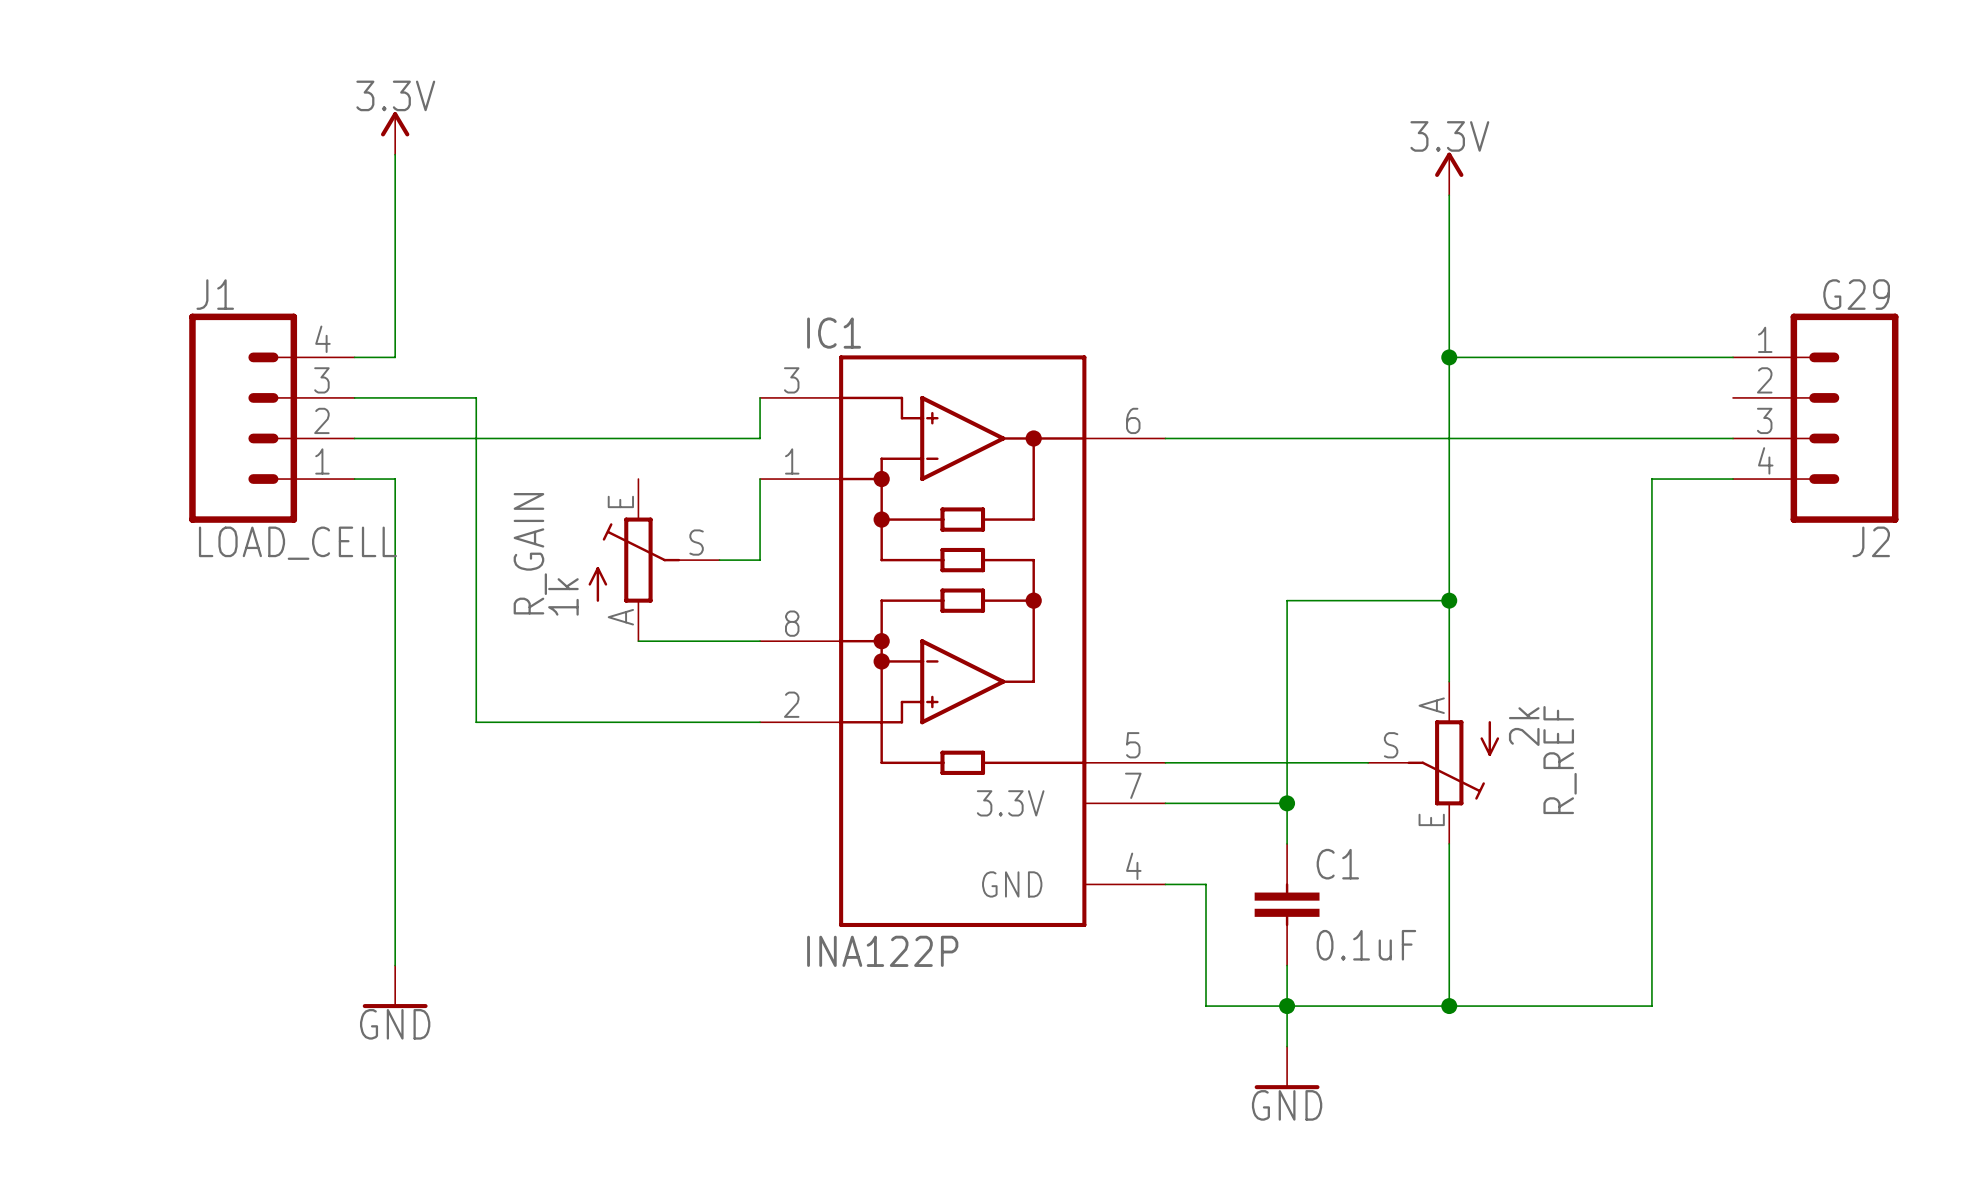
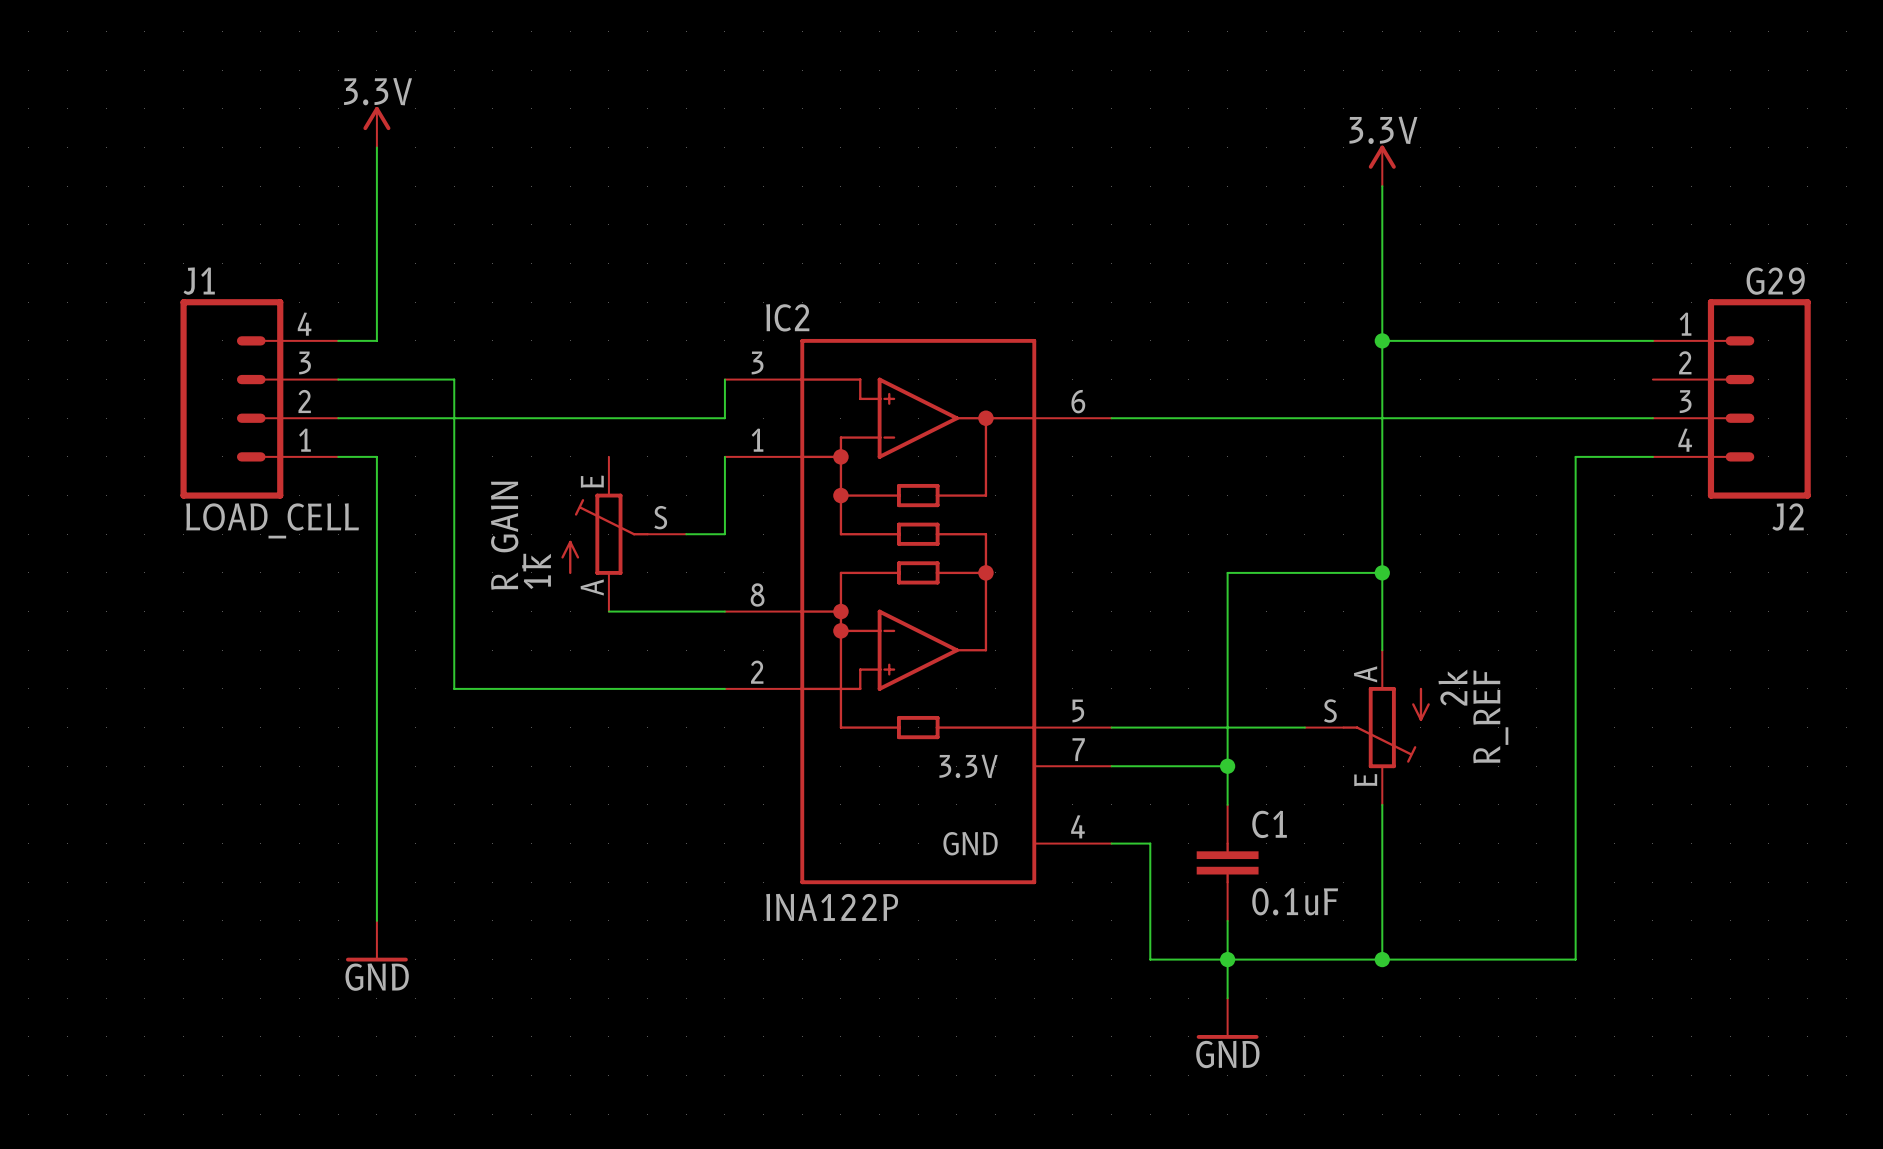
IC1 name: IC1 (834, 333) -> IC2 (787, 317)

